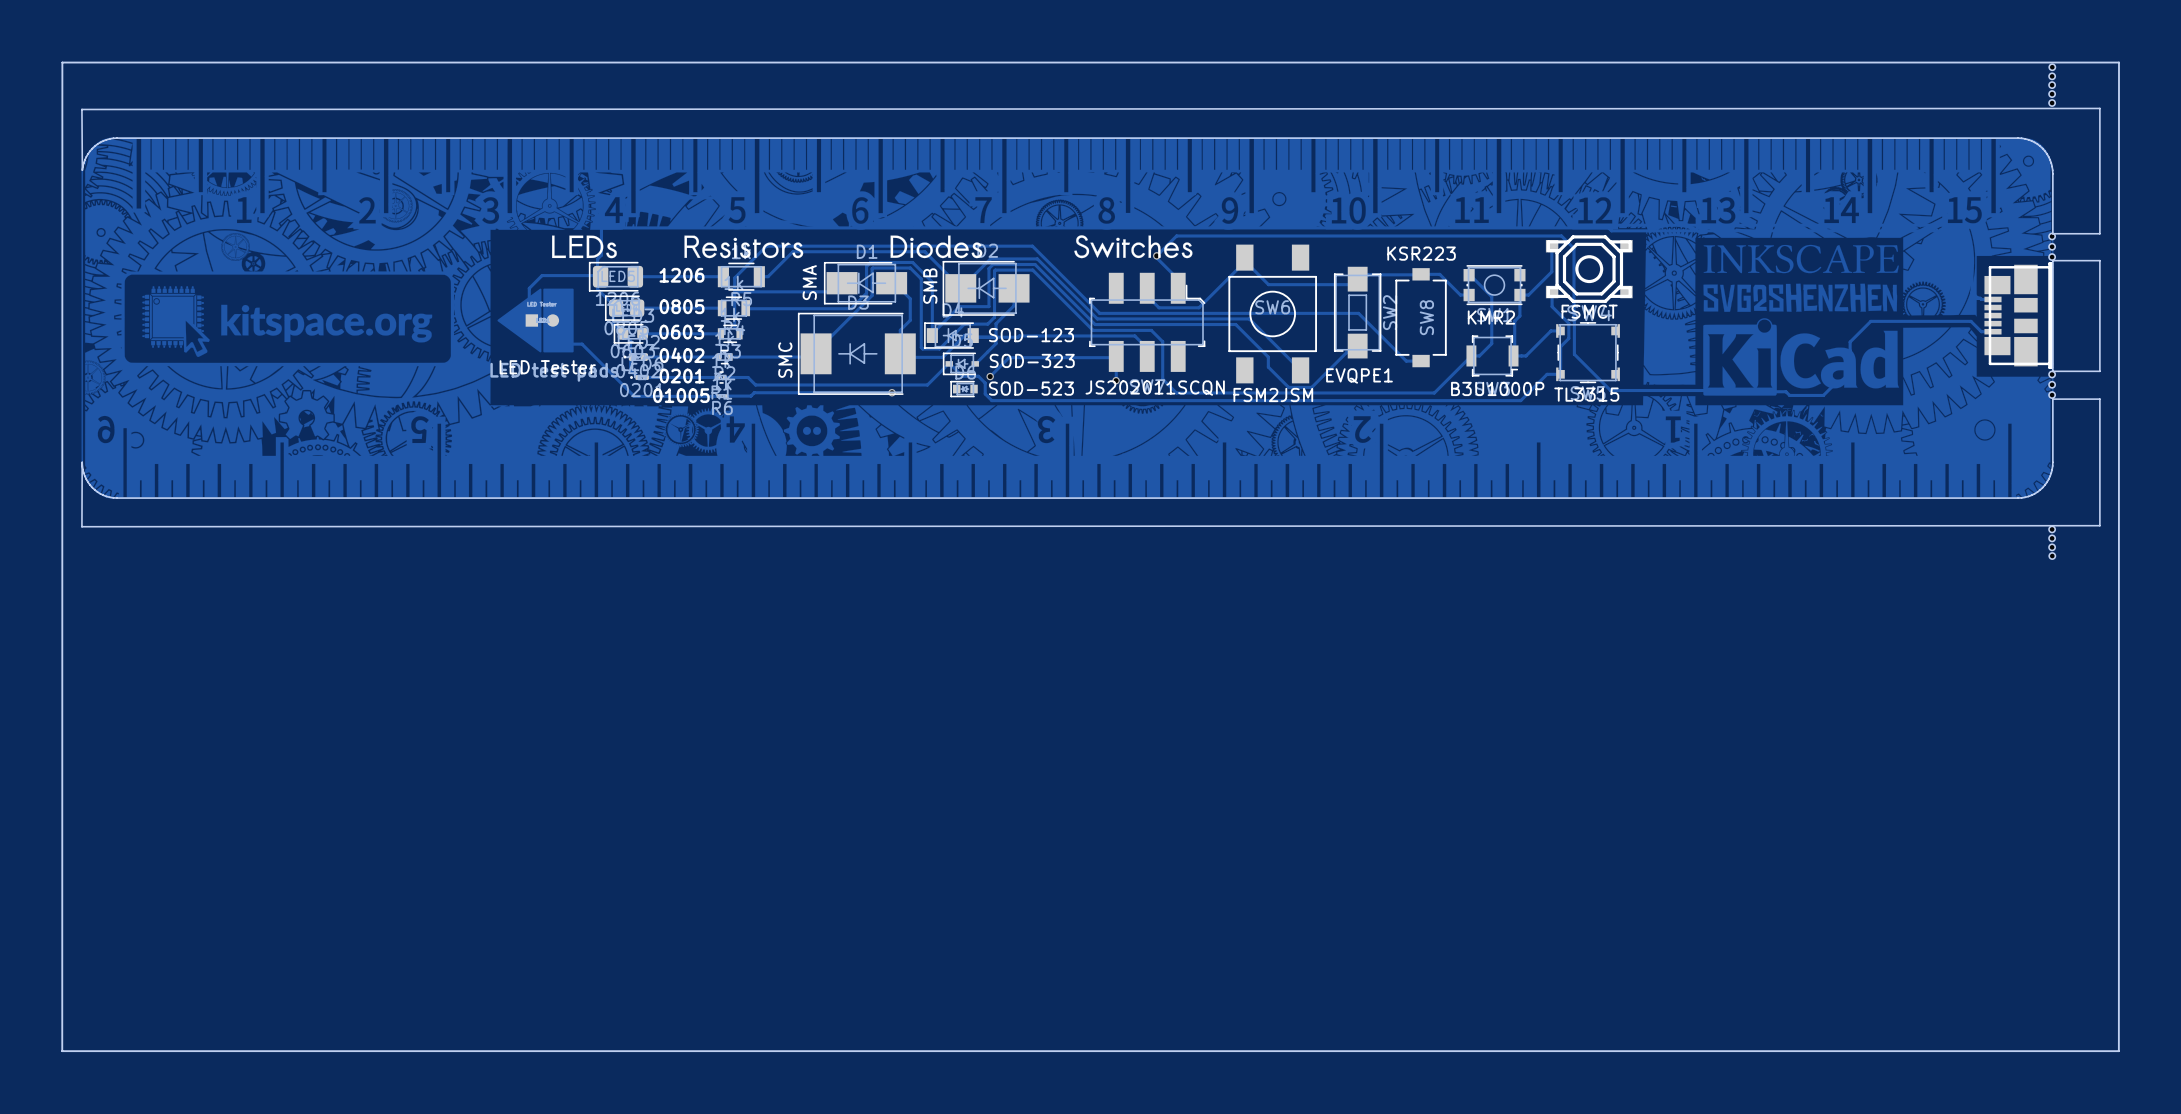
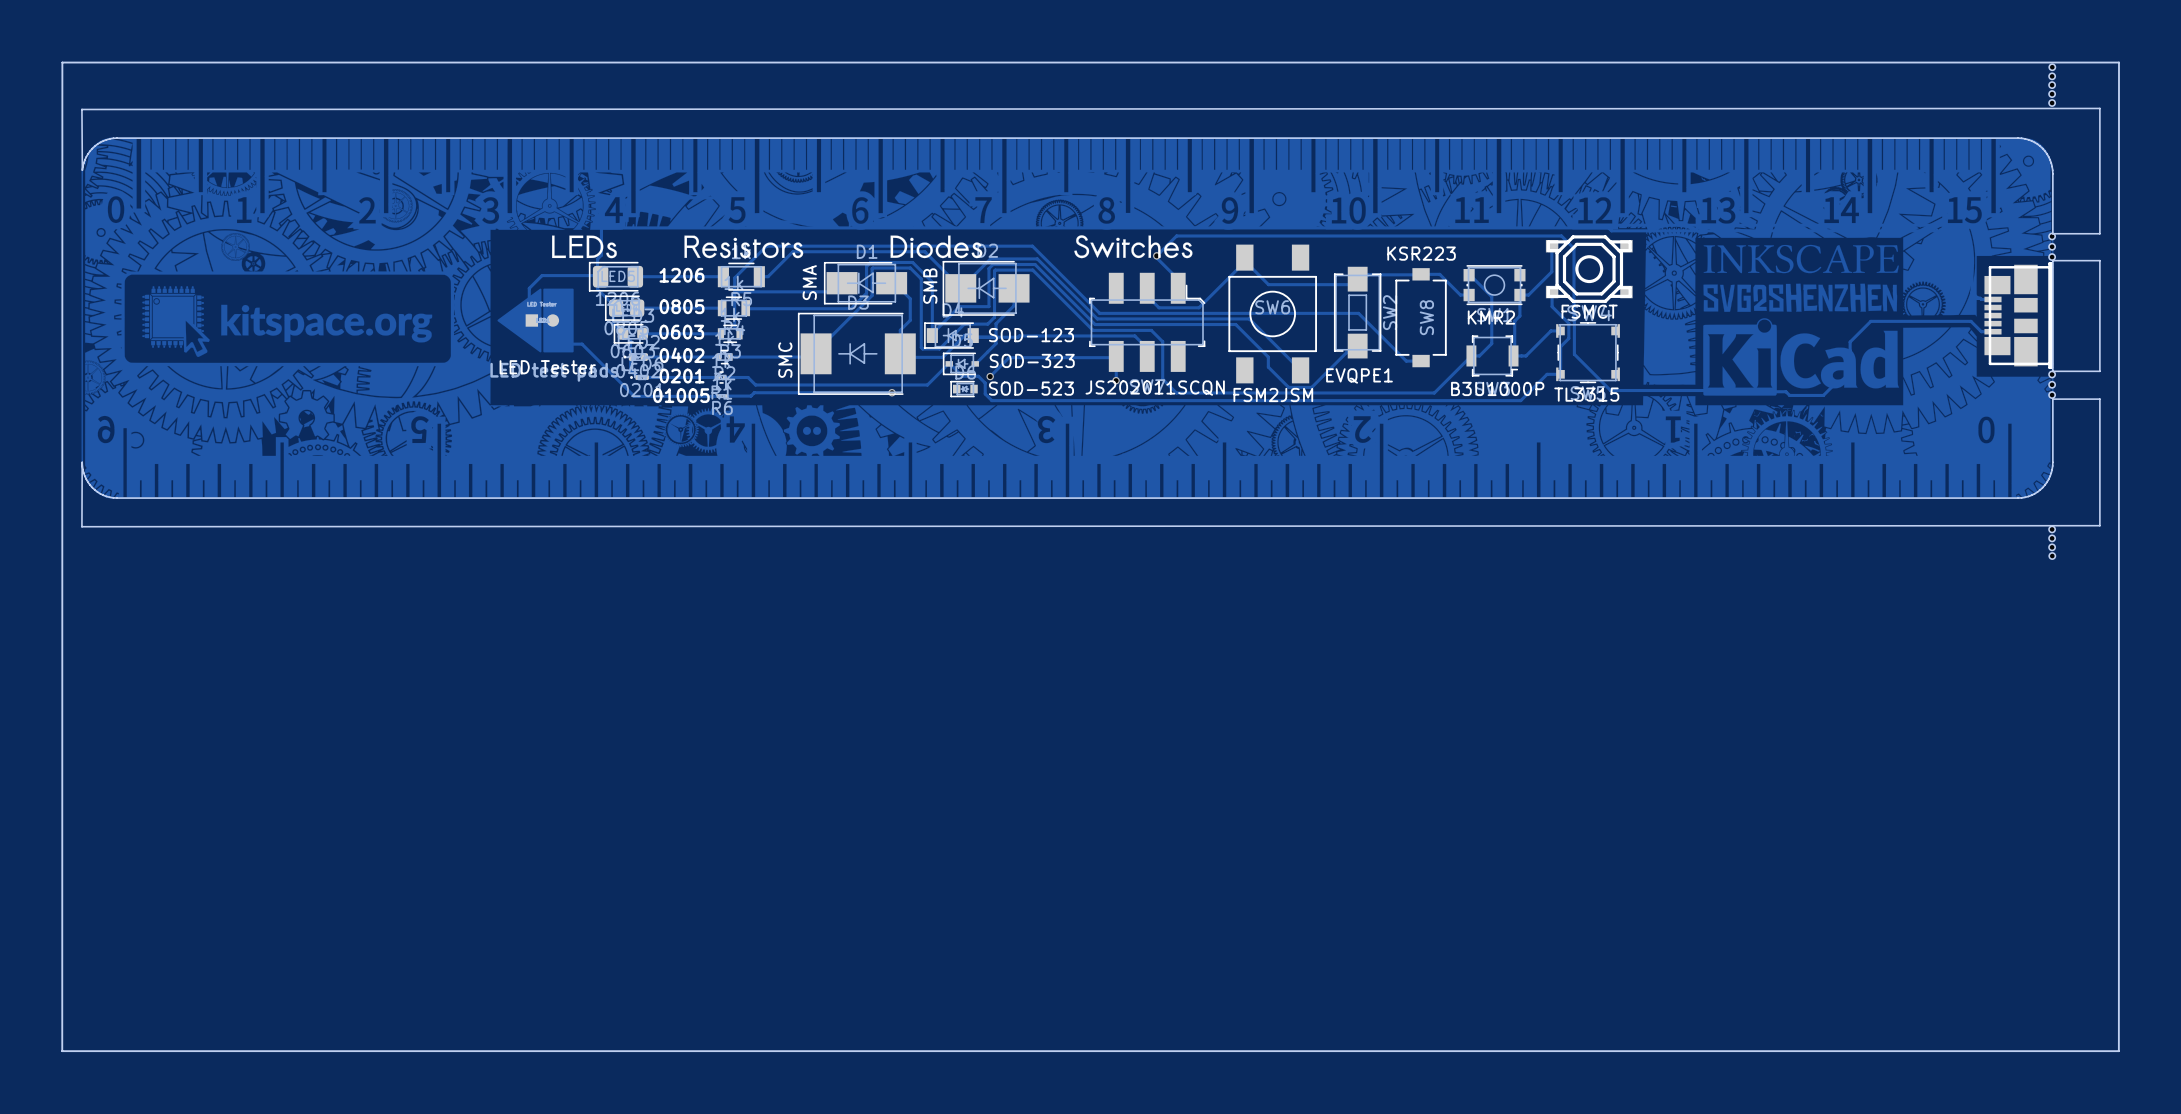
part footprint: [81, 64, 2101, 560] -> [81, 64, 2101, 560]

